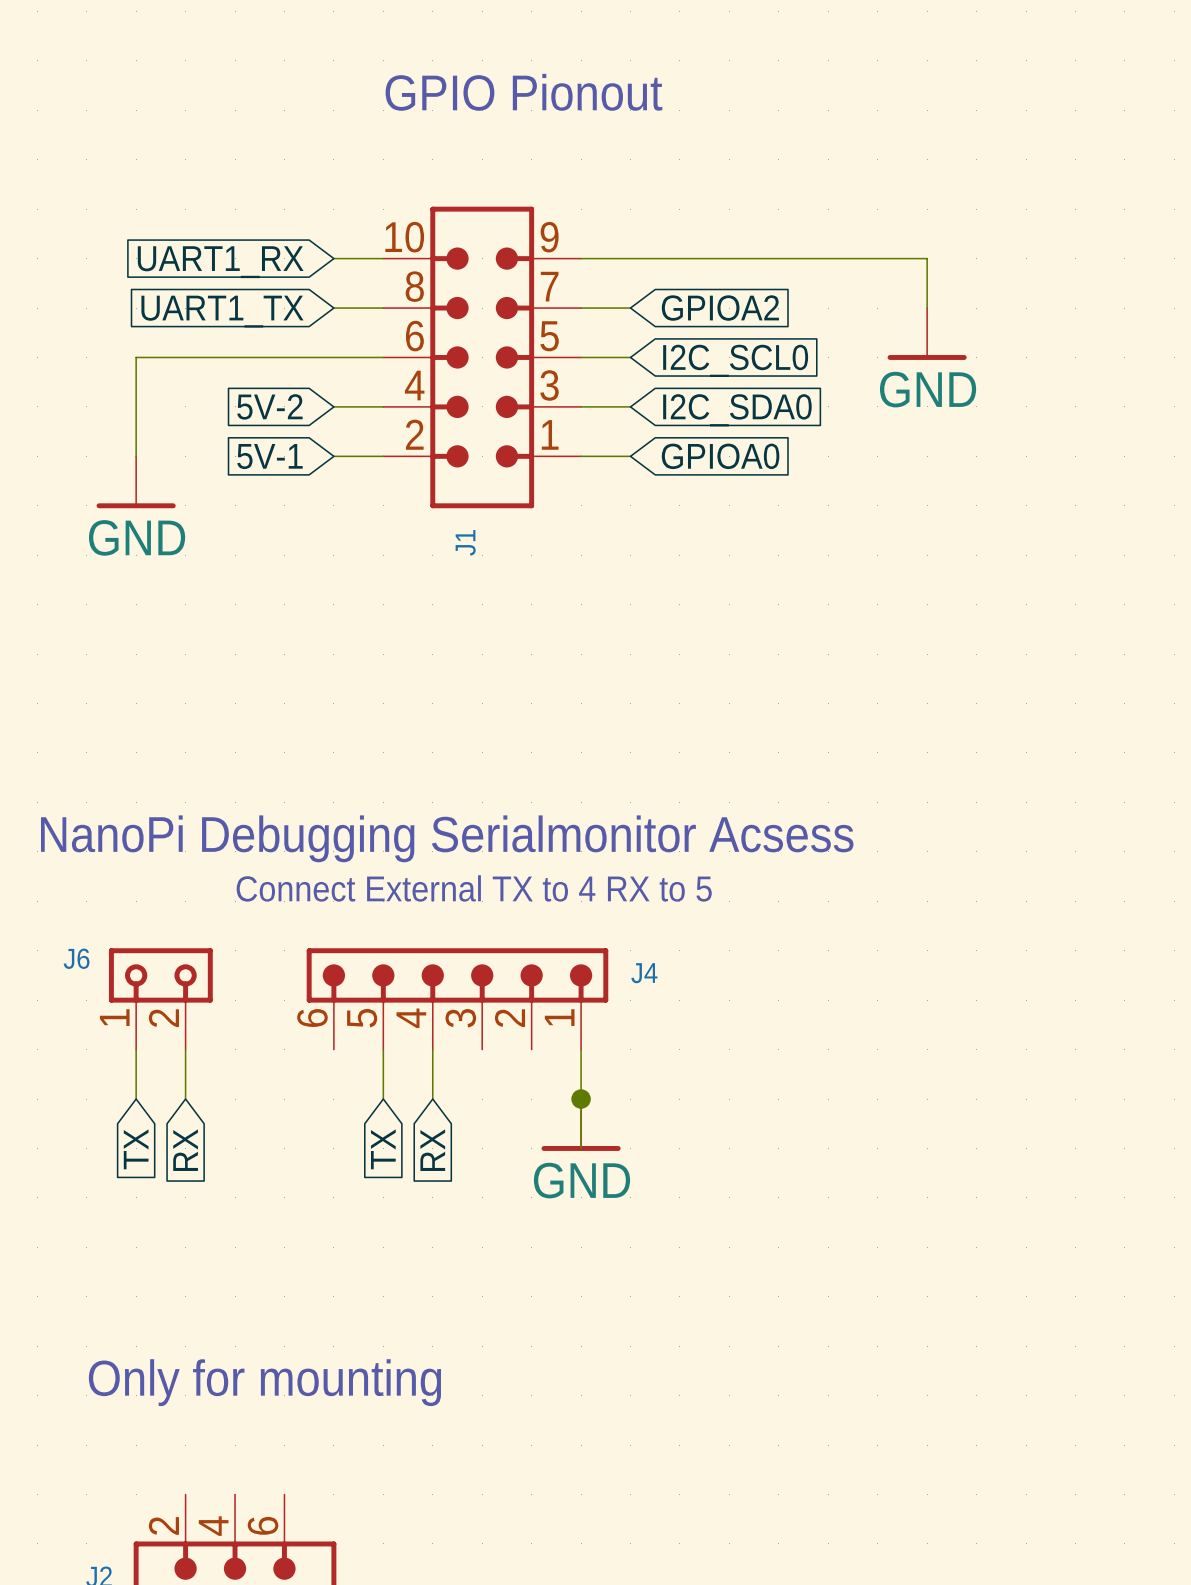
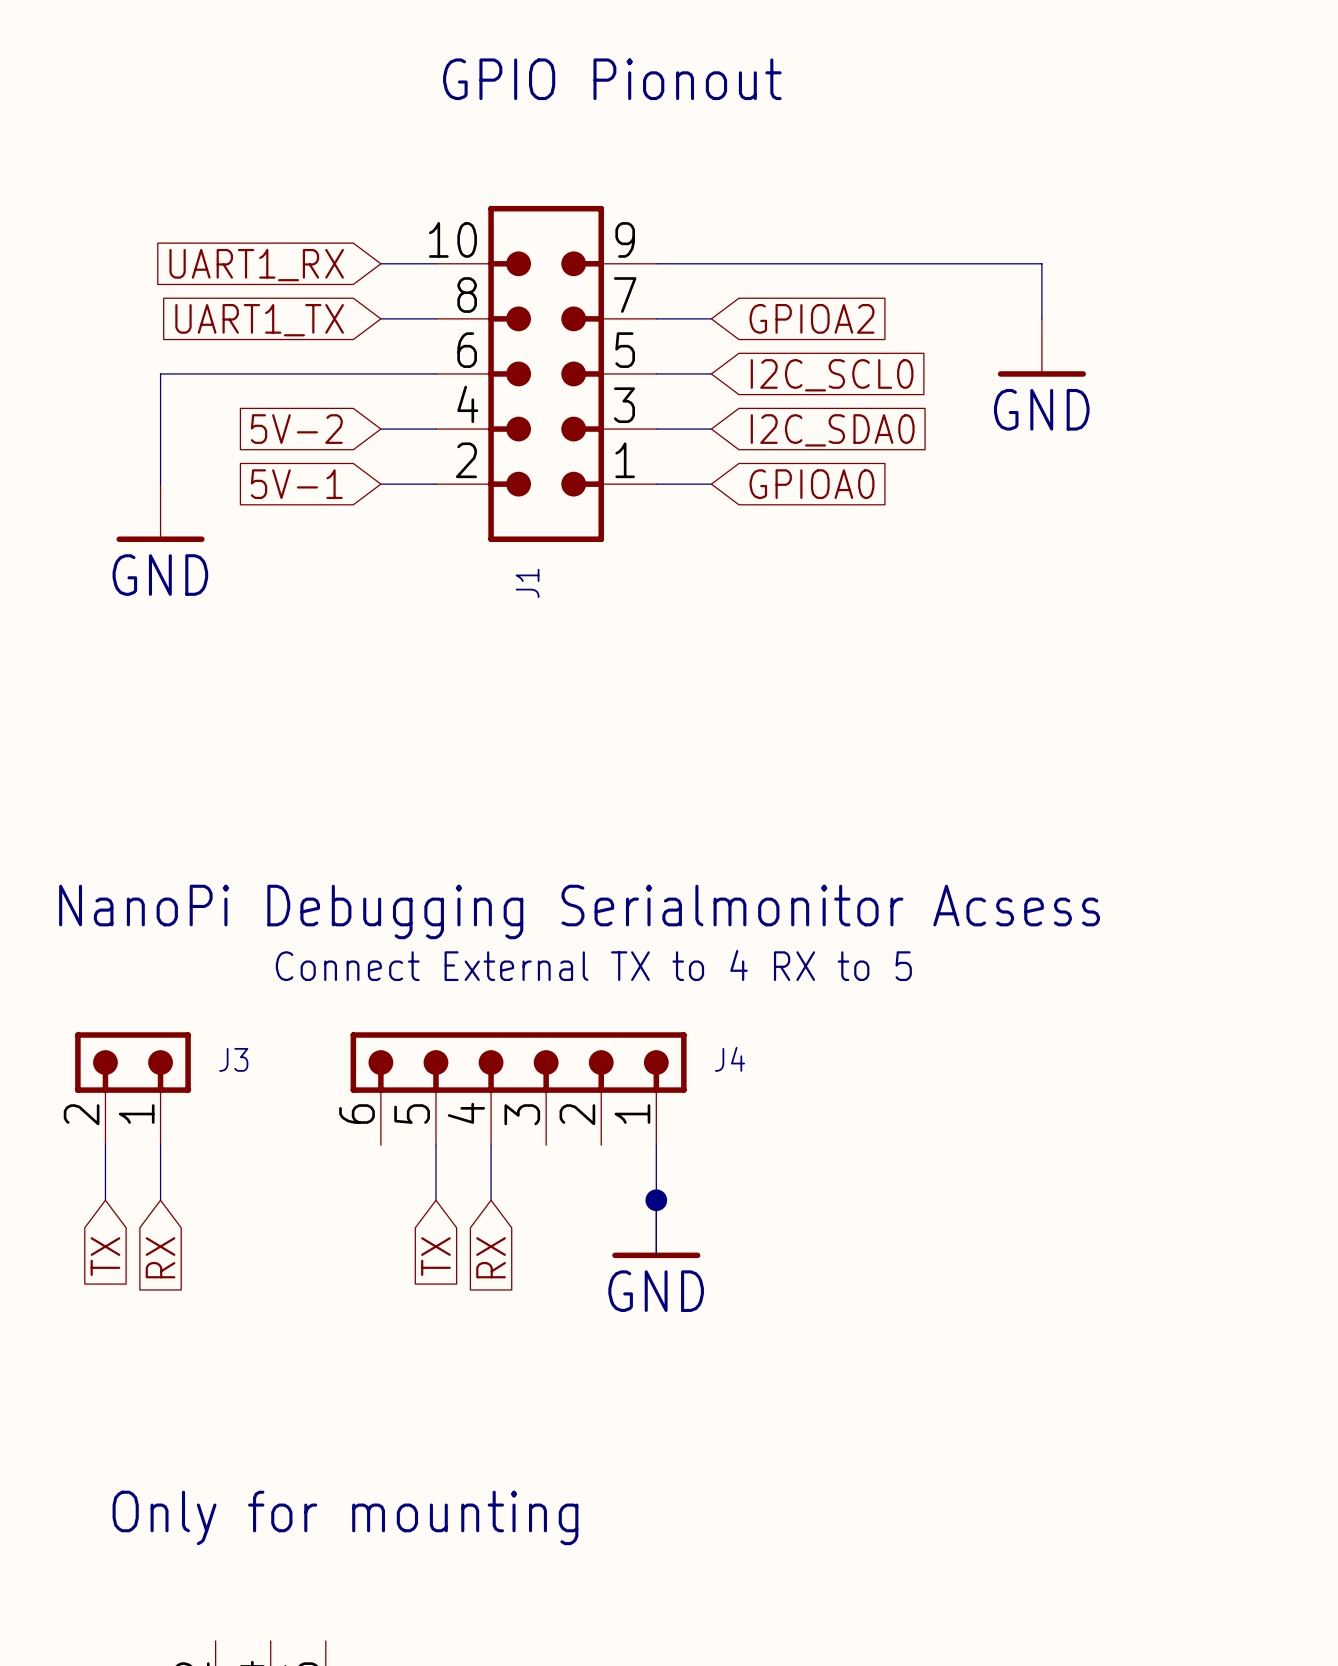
J3: none -> (133, 1088)
J6: (160, 998) -> none
wire: (185, 1049) (185, 1099) -> (105, 1145) (105, 1200)
global label: none -> TX (105, 1256)
global label: TX (136, 1149) -> RX (160, 1257)
global label: RX (185, 1150) -> none

